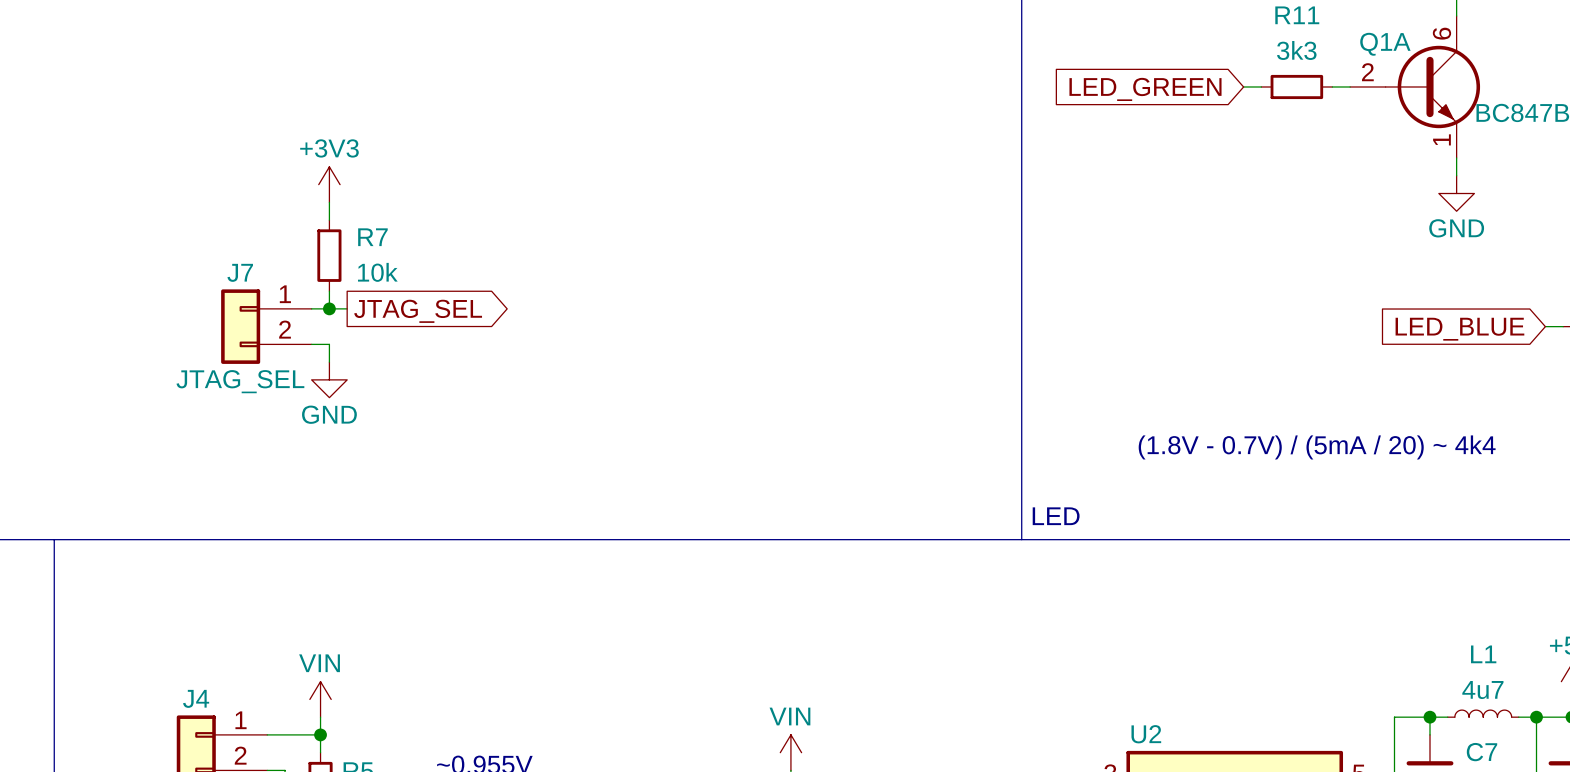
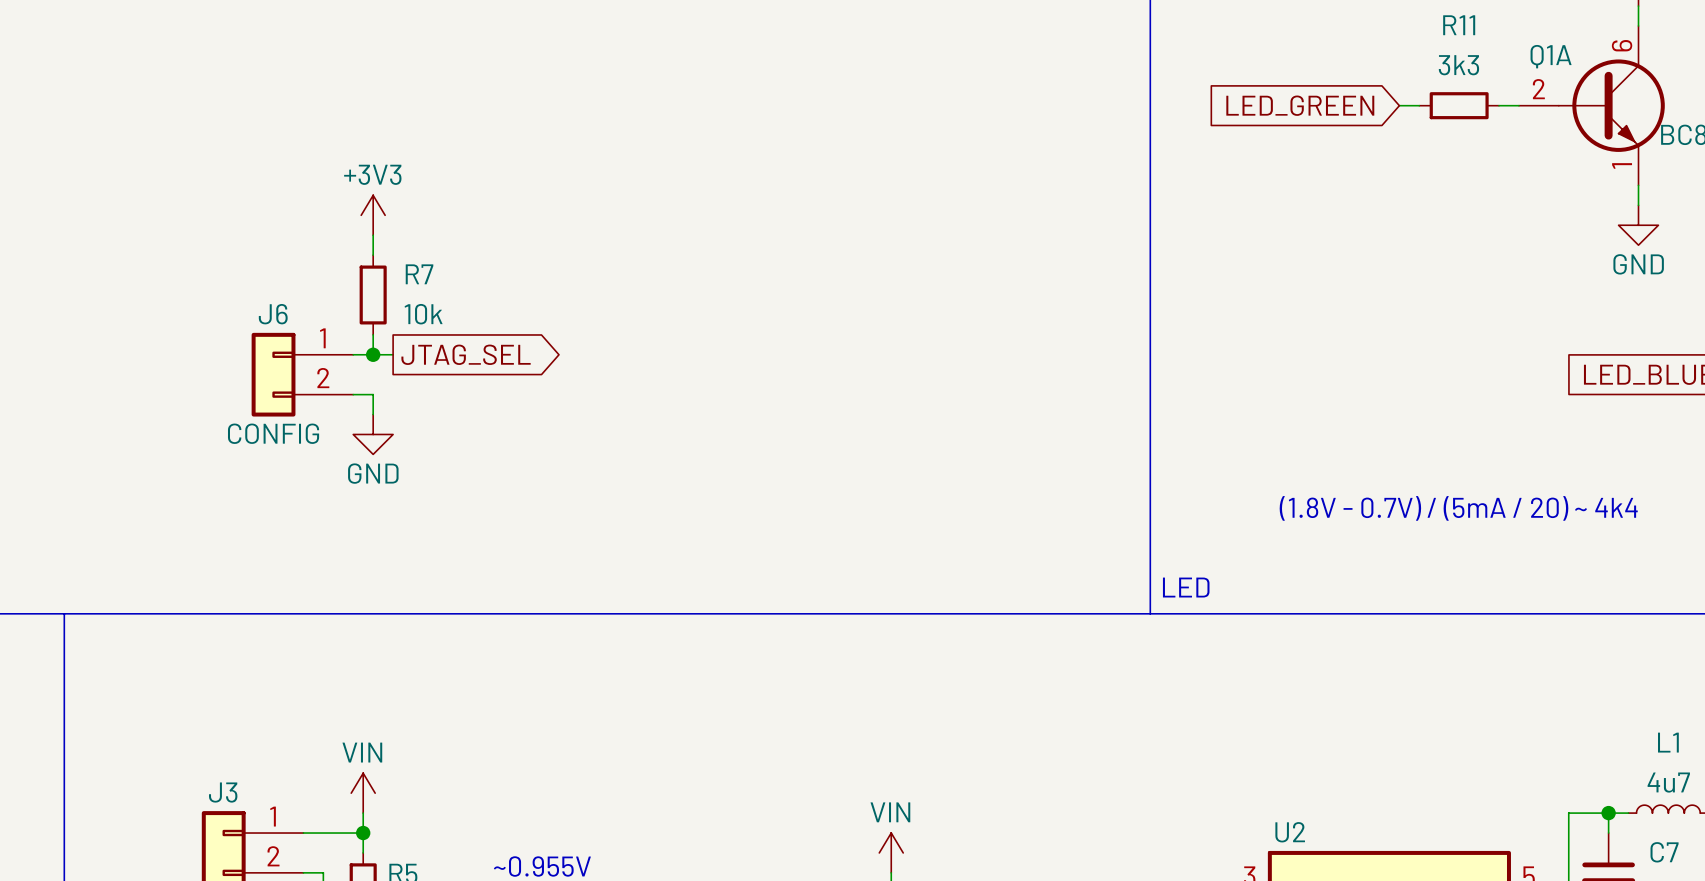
J7 name: J7 (240, 272) -> J6 (273, 314)
J7 value: JTAG_SEL (240, 381) -> CONFIG (273, 433)
J4 name: J4 (196, 698) -> J3 (223, 792)

